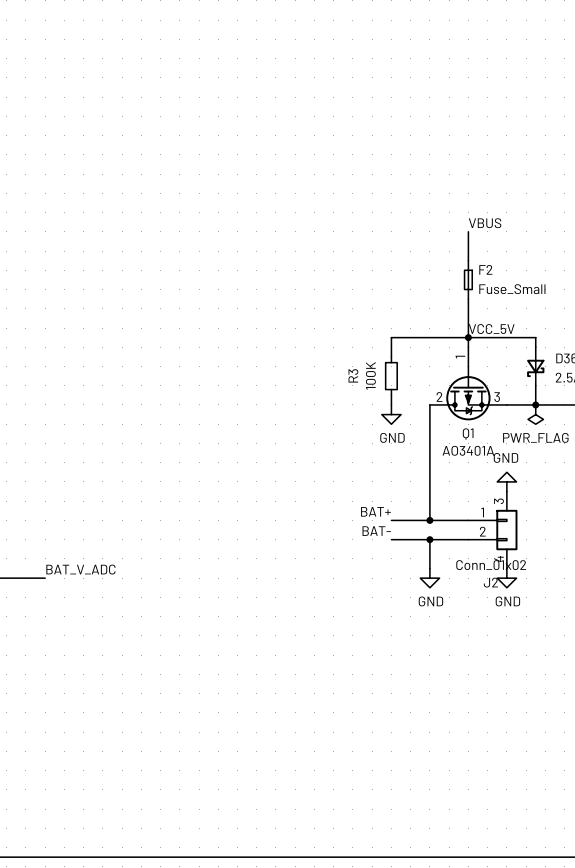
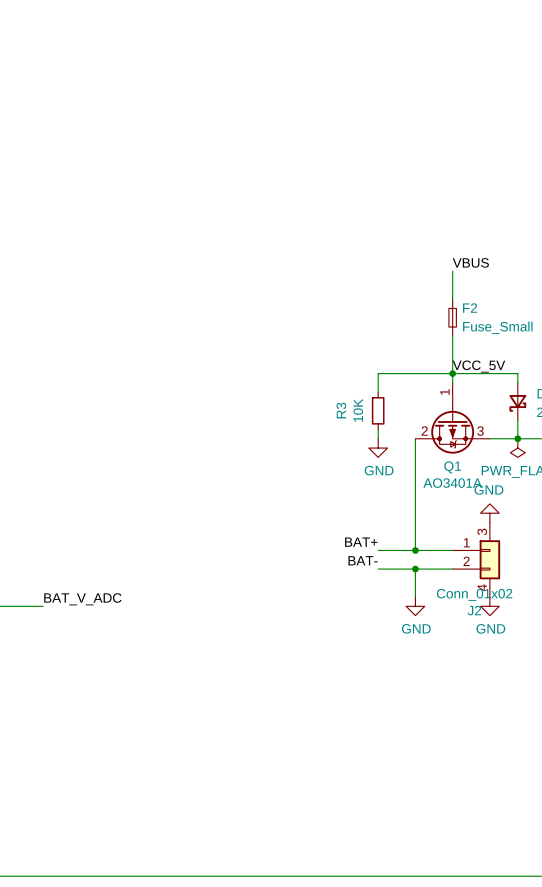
R3 value: 100K (370, 375) -> 10K (358, 410)

